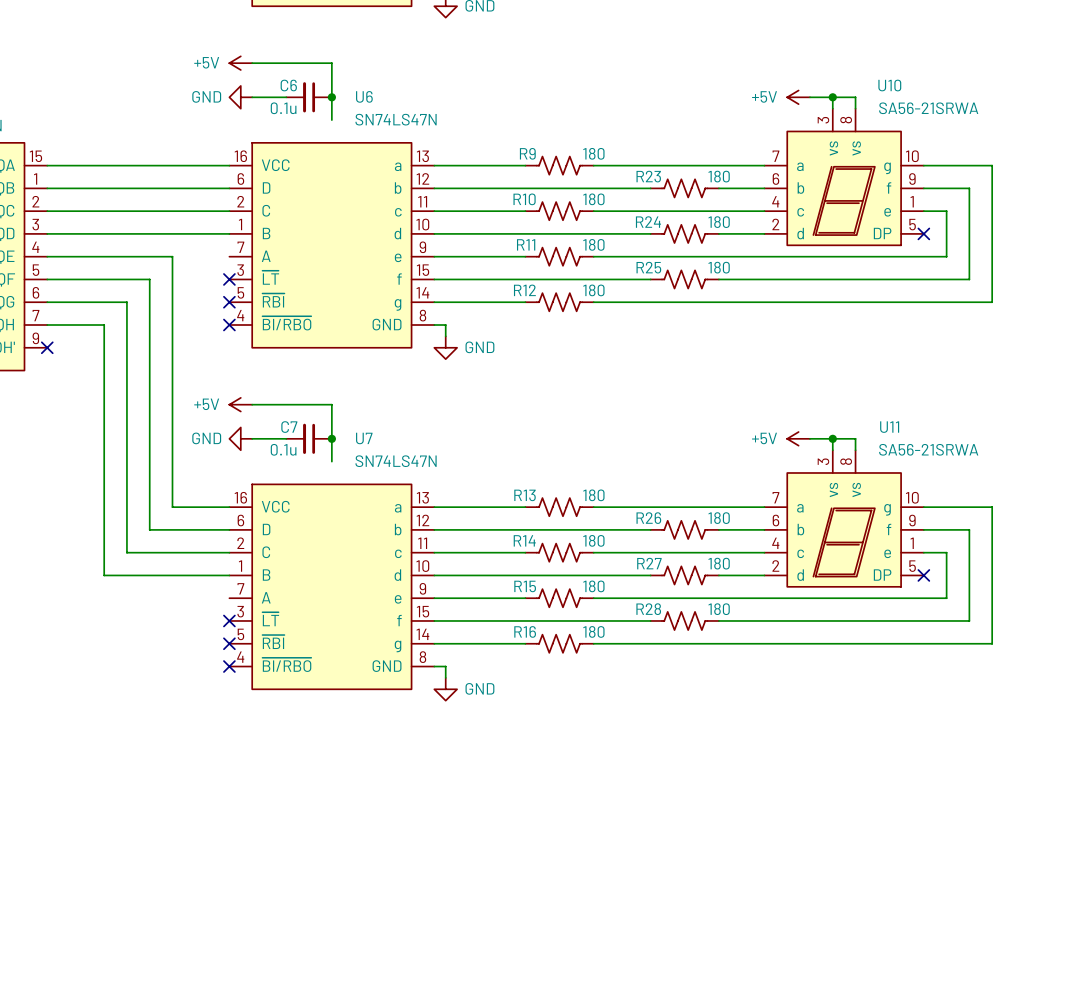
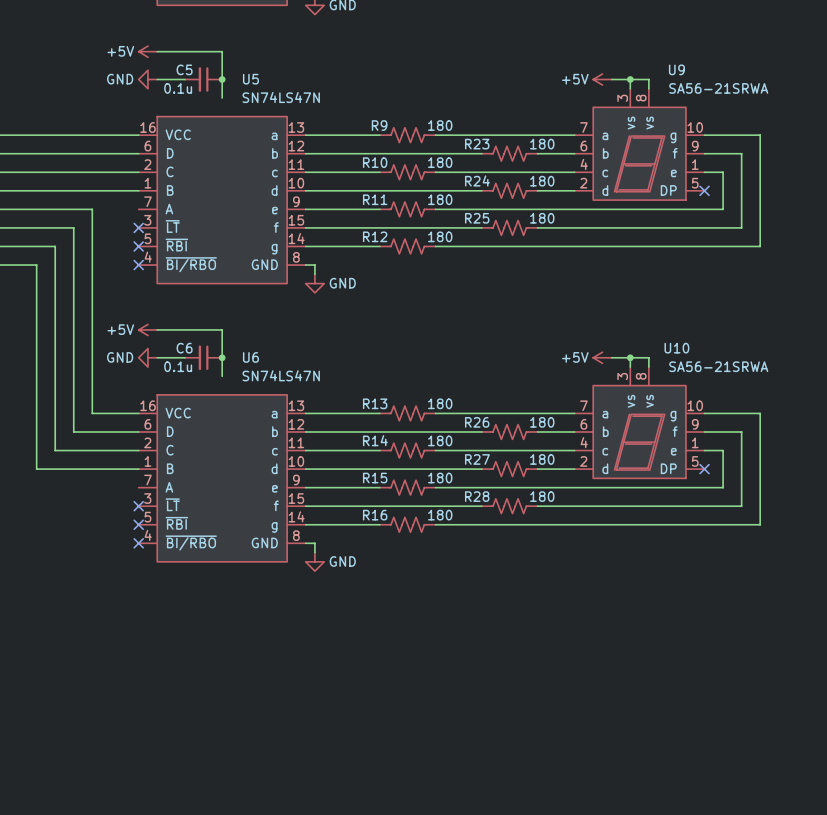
C6 name: C6 (288, 85) -> C5 (184, 69)
U10 name: U10 (889, 85) -> U9 (676, 69)
U6 name: U6 (364, 96) -> U5 (250, 79)
C7 name: C7 (289, 427) -> C6 (184, 348)
U11 name: U11 (889, 427) -> U10 (676, 348)
U7 name: U7 (364, 438) -> U6 (250, 357)

